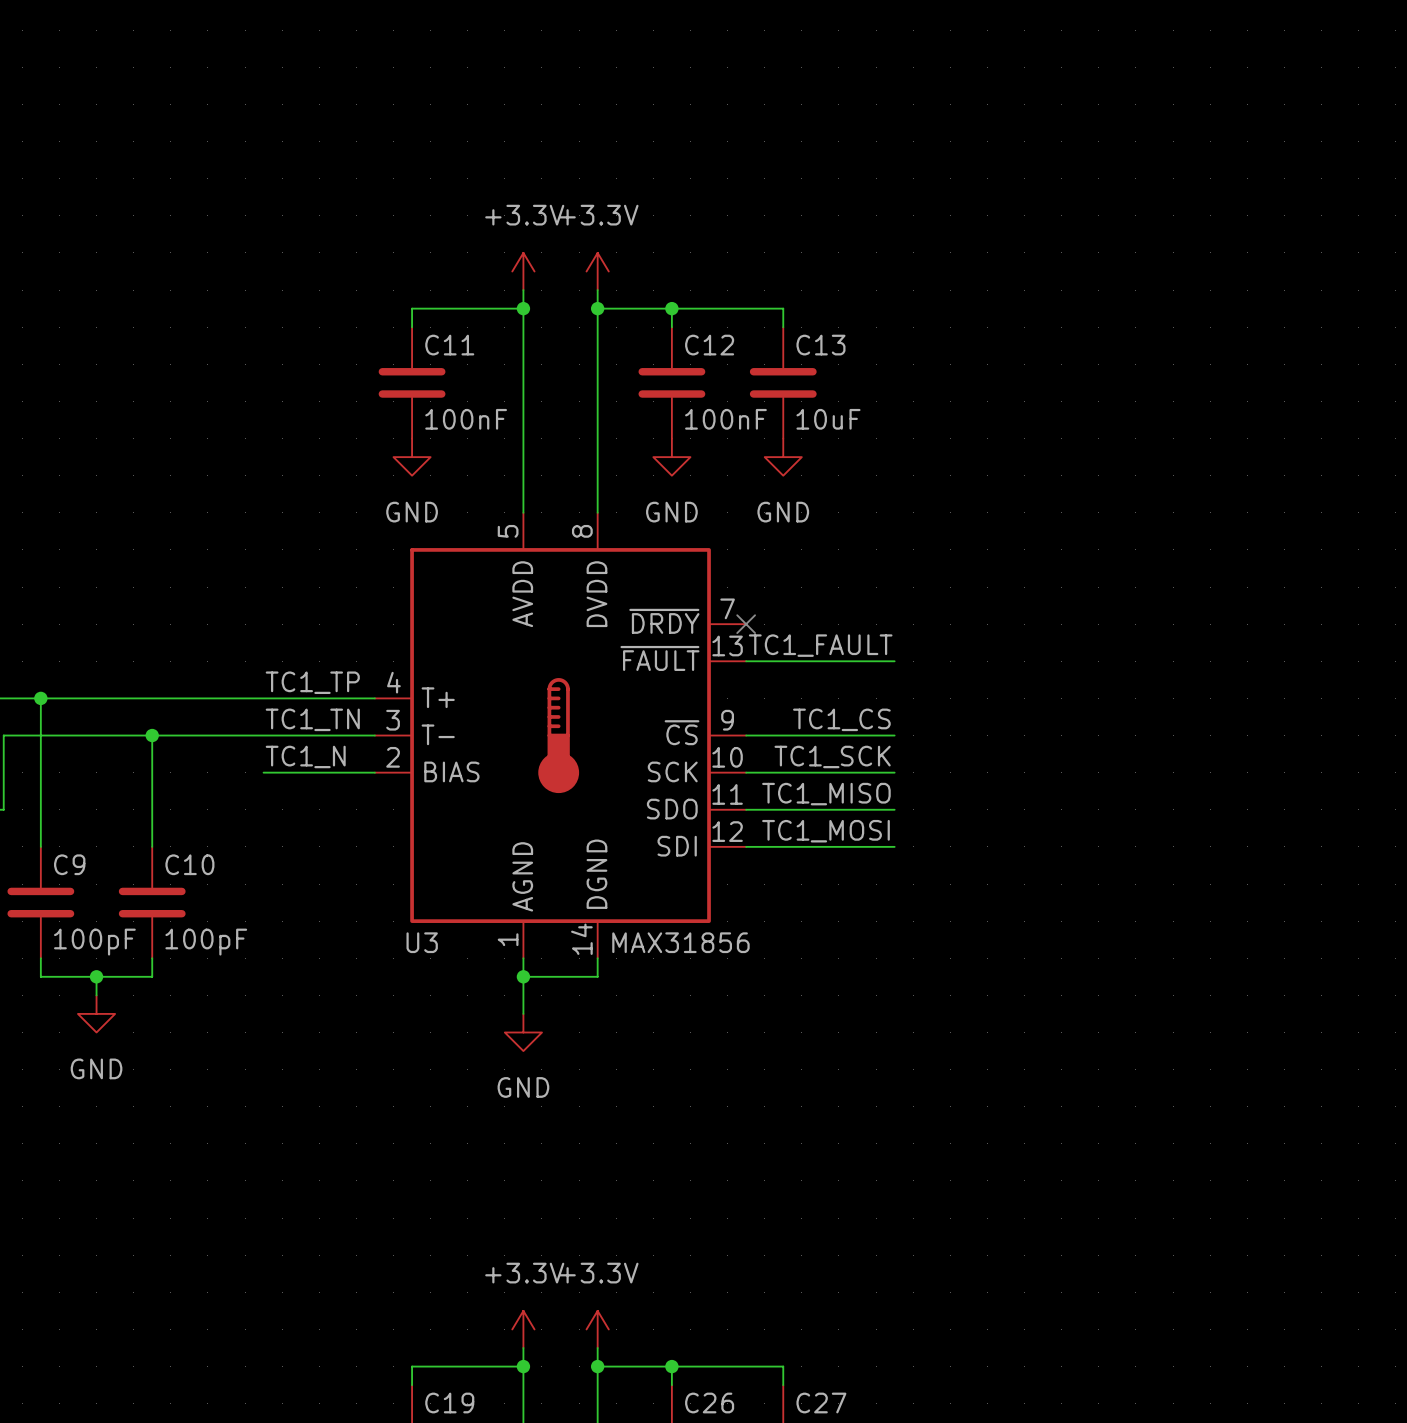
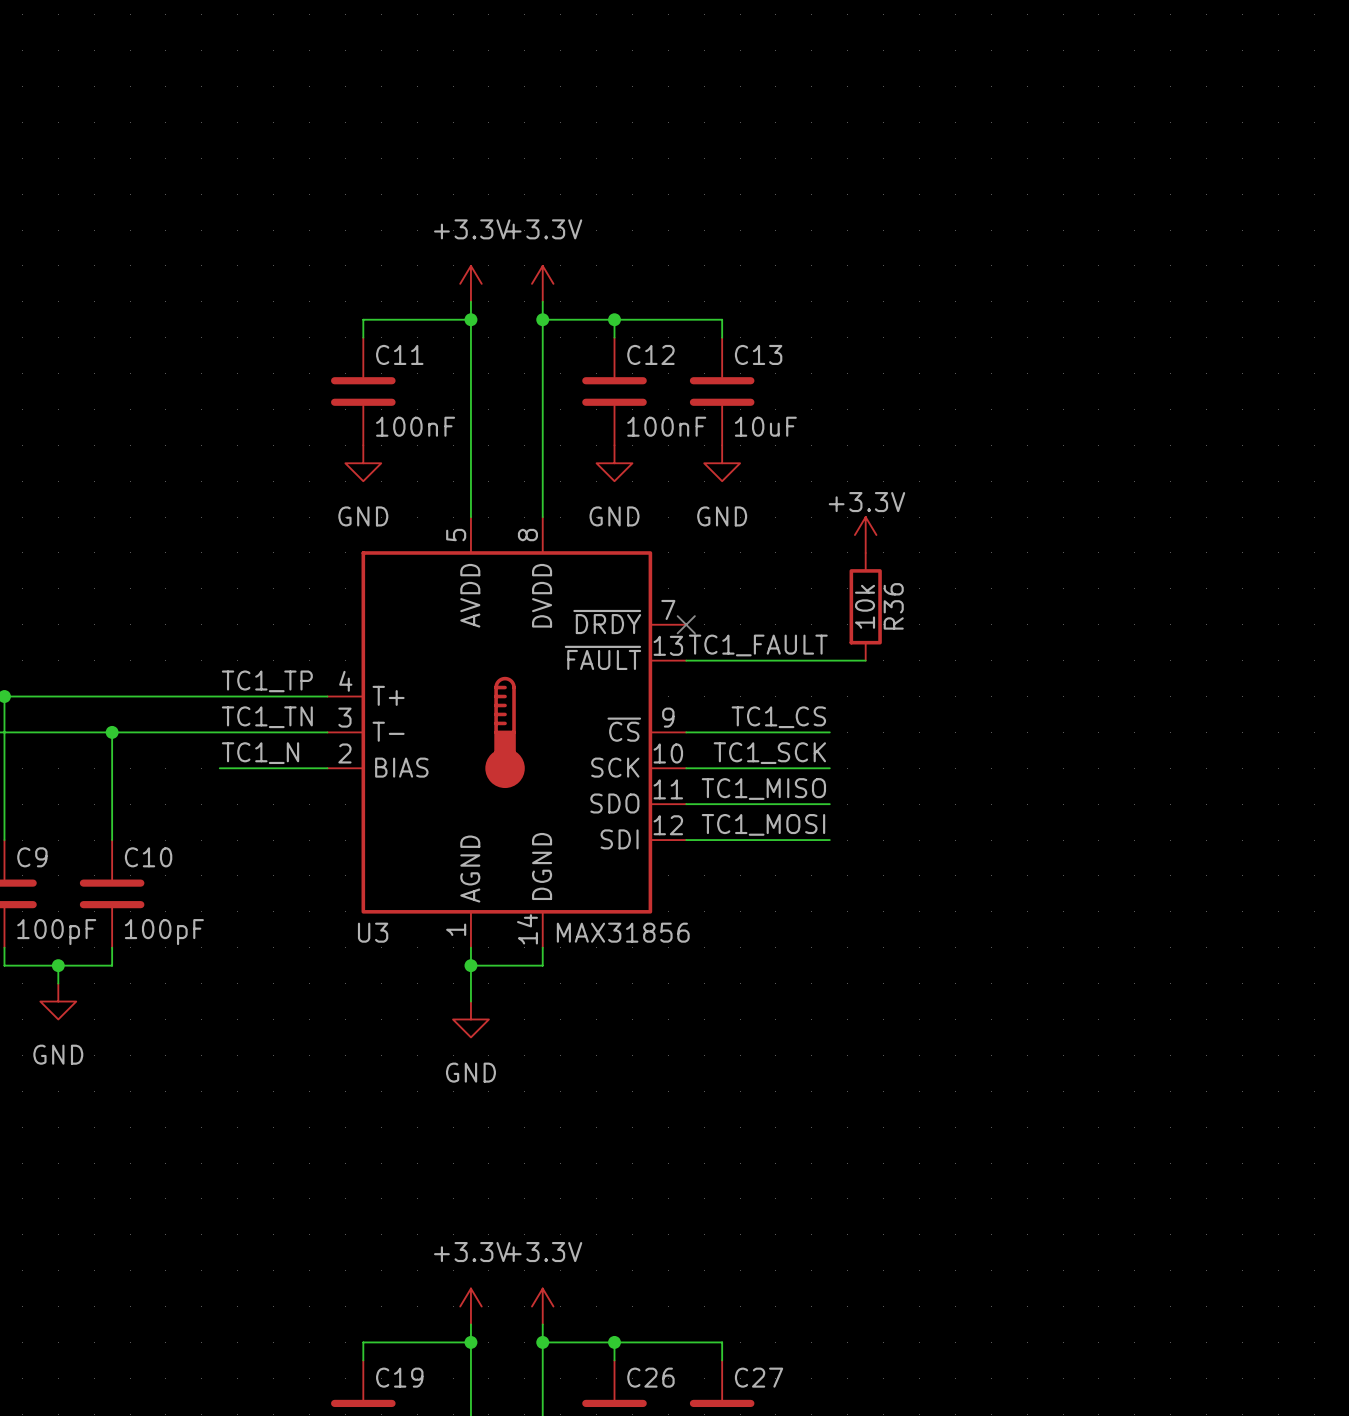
power symbol: none -> +3.3V (865, 535)
R36: none -> 10k (865, 606)
wire: none -> (829, 660) (865, 660)

